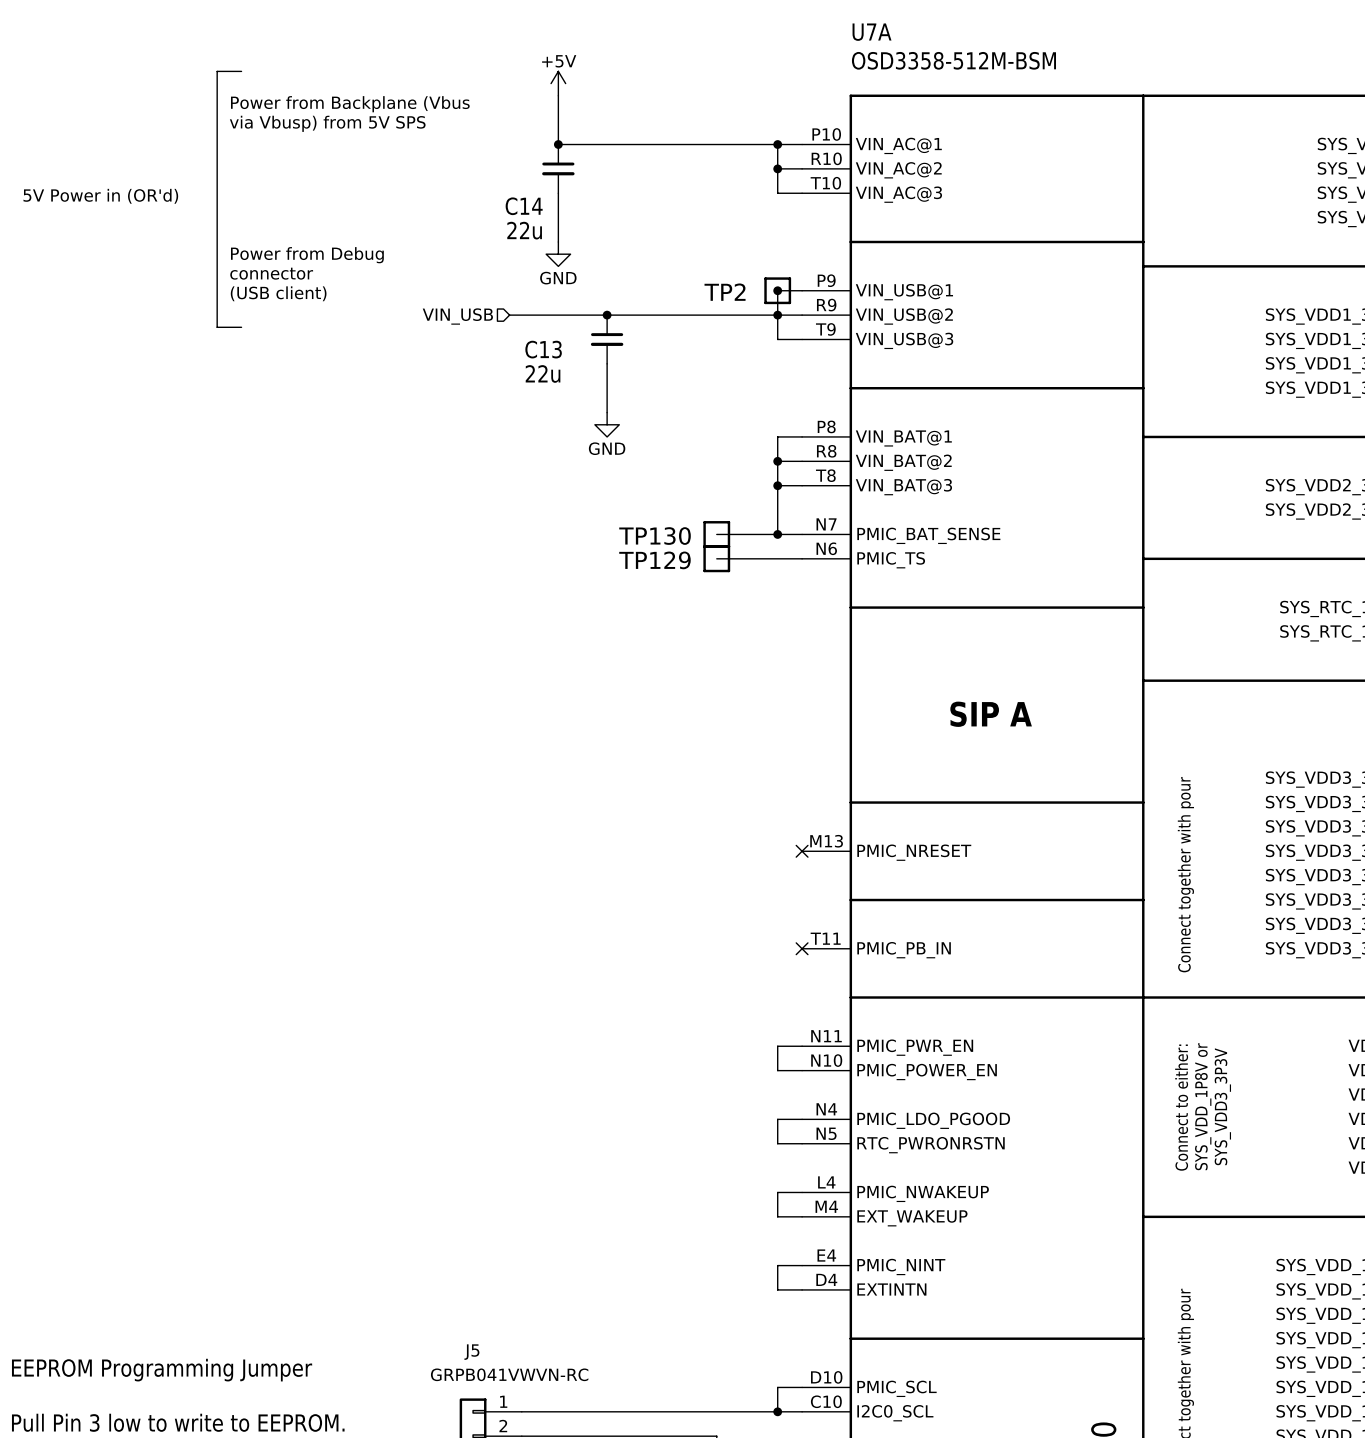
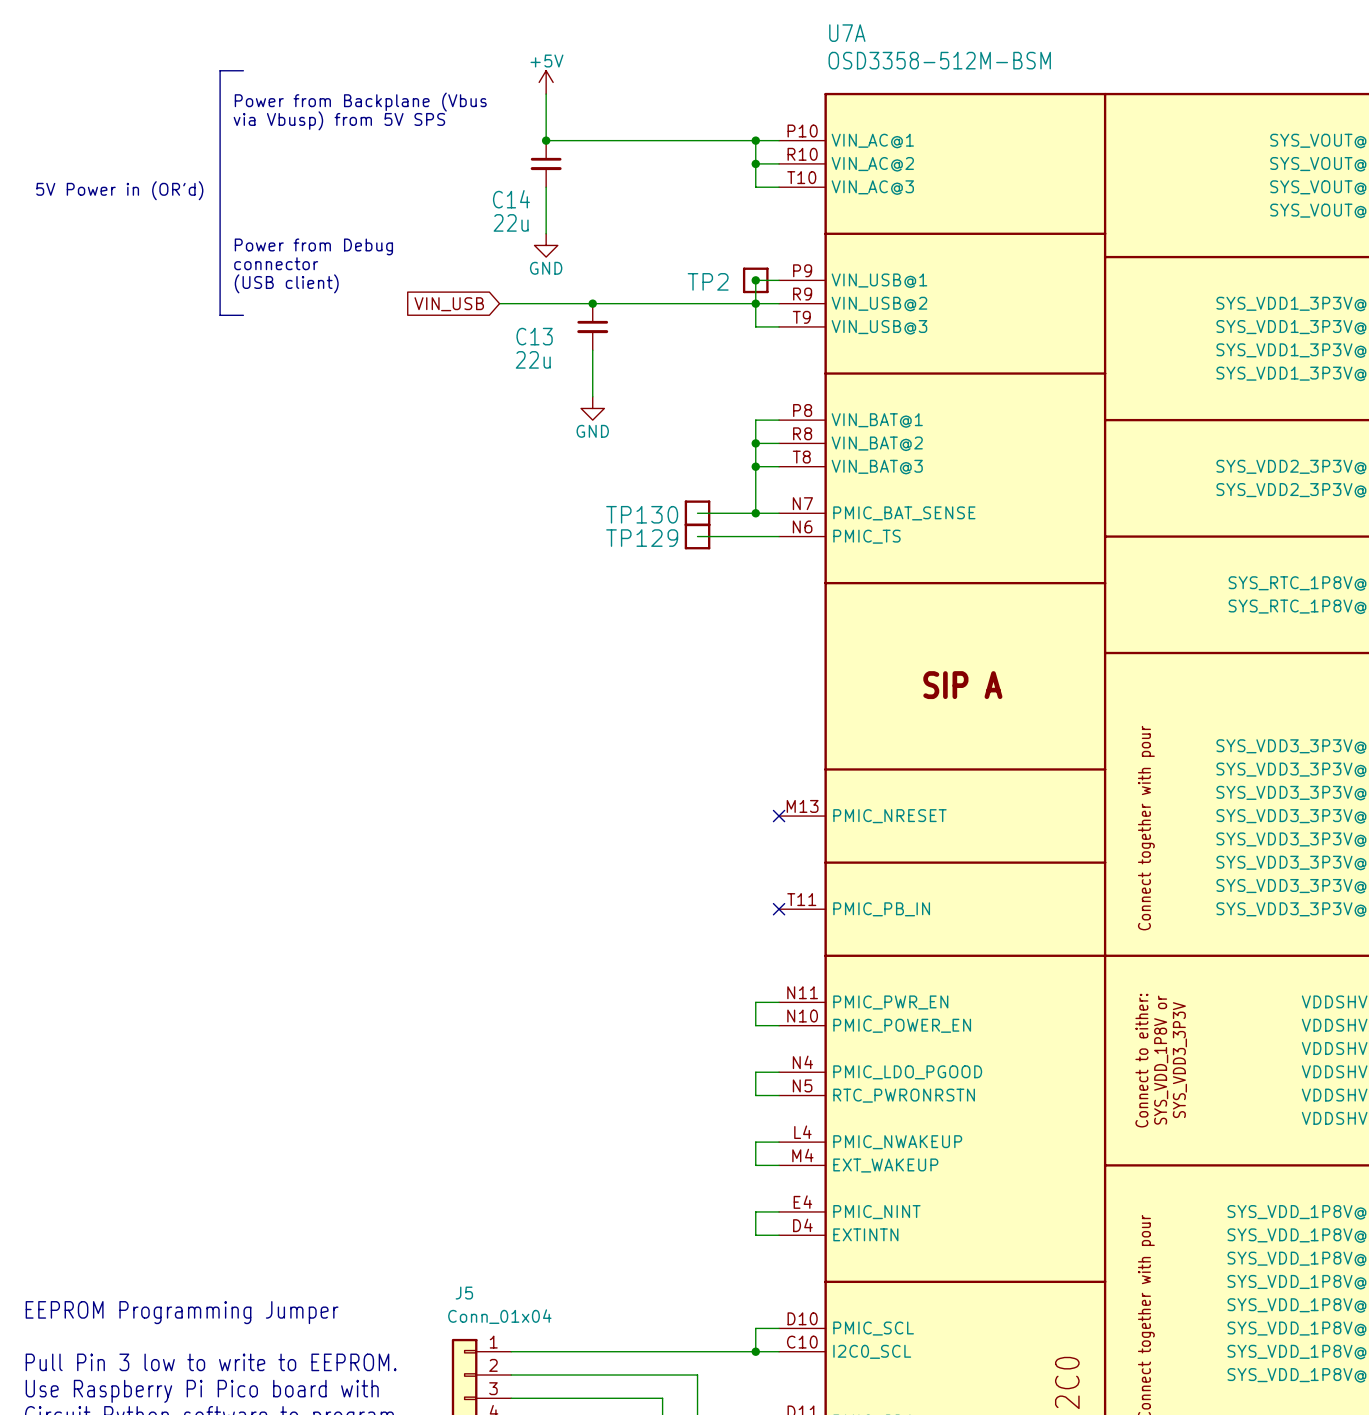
hierarchical label: VIN_USB (457, 316) -> none
global label: none -> VIN_USB (449, 304)
J5 value: GRPB041VWVN-RC (509, 1374) -> Conn_01x04 (499, 1316)

